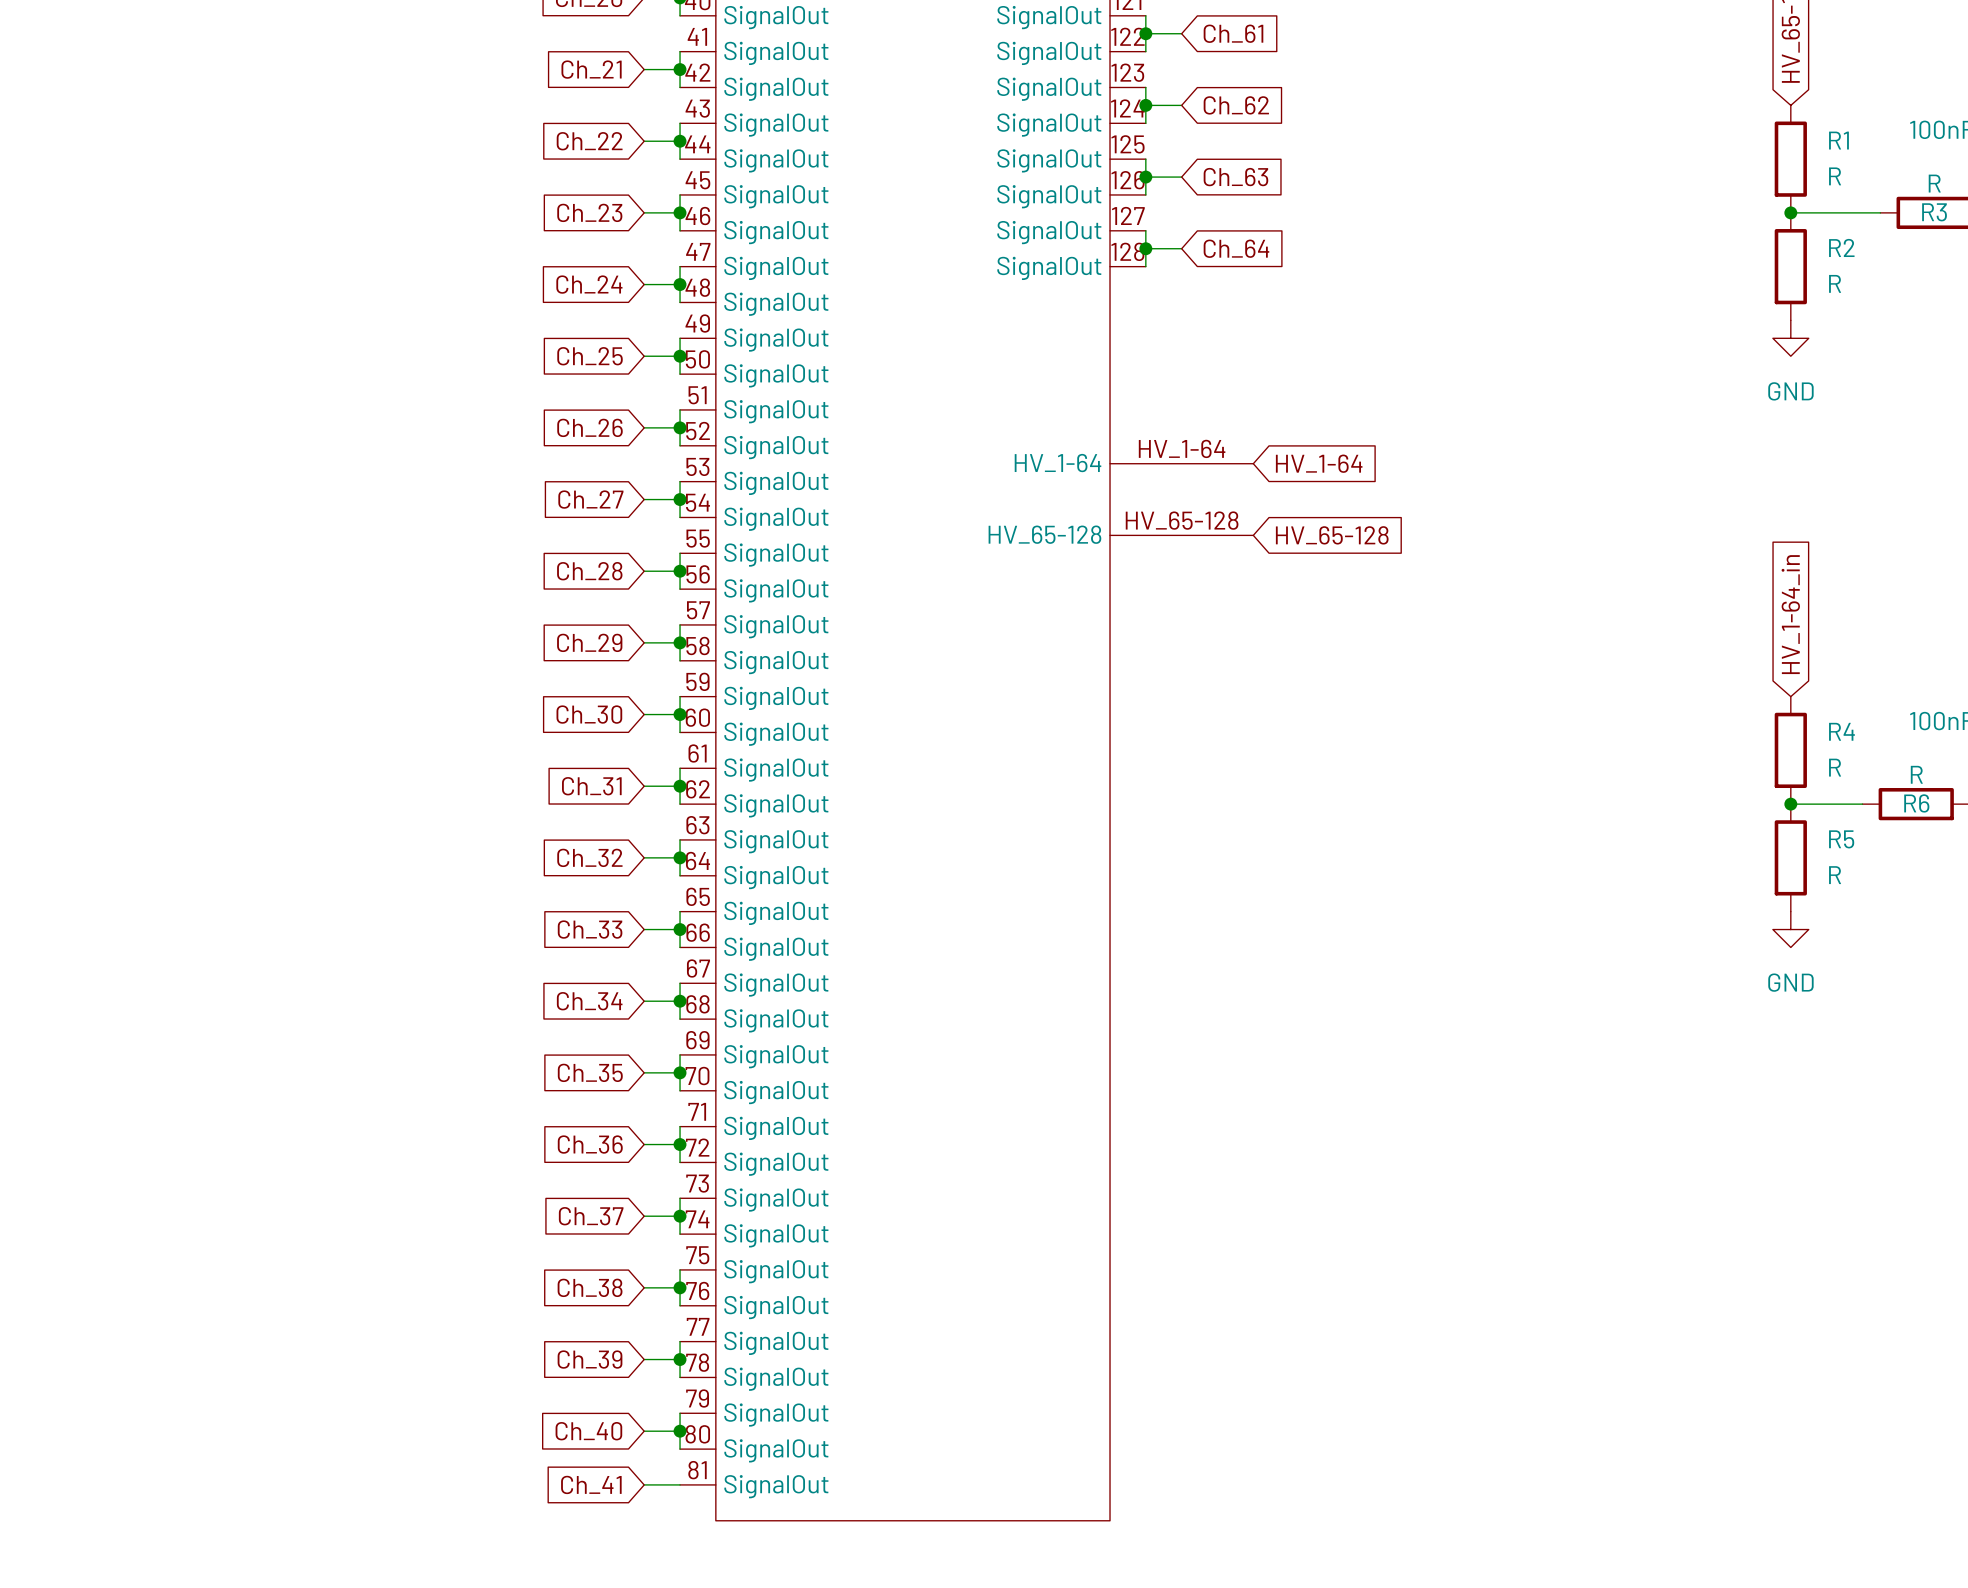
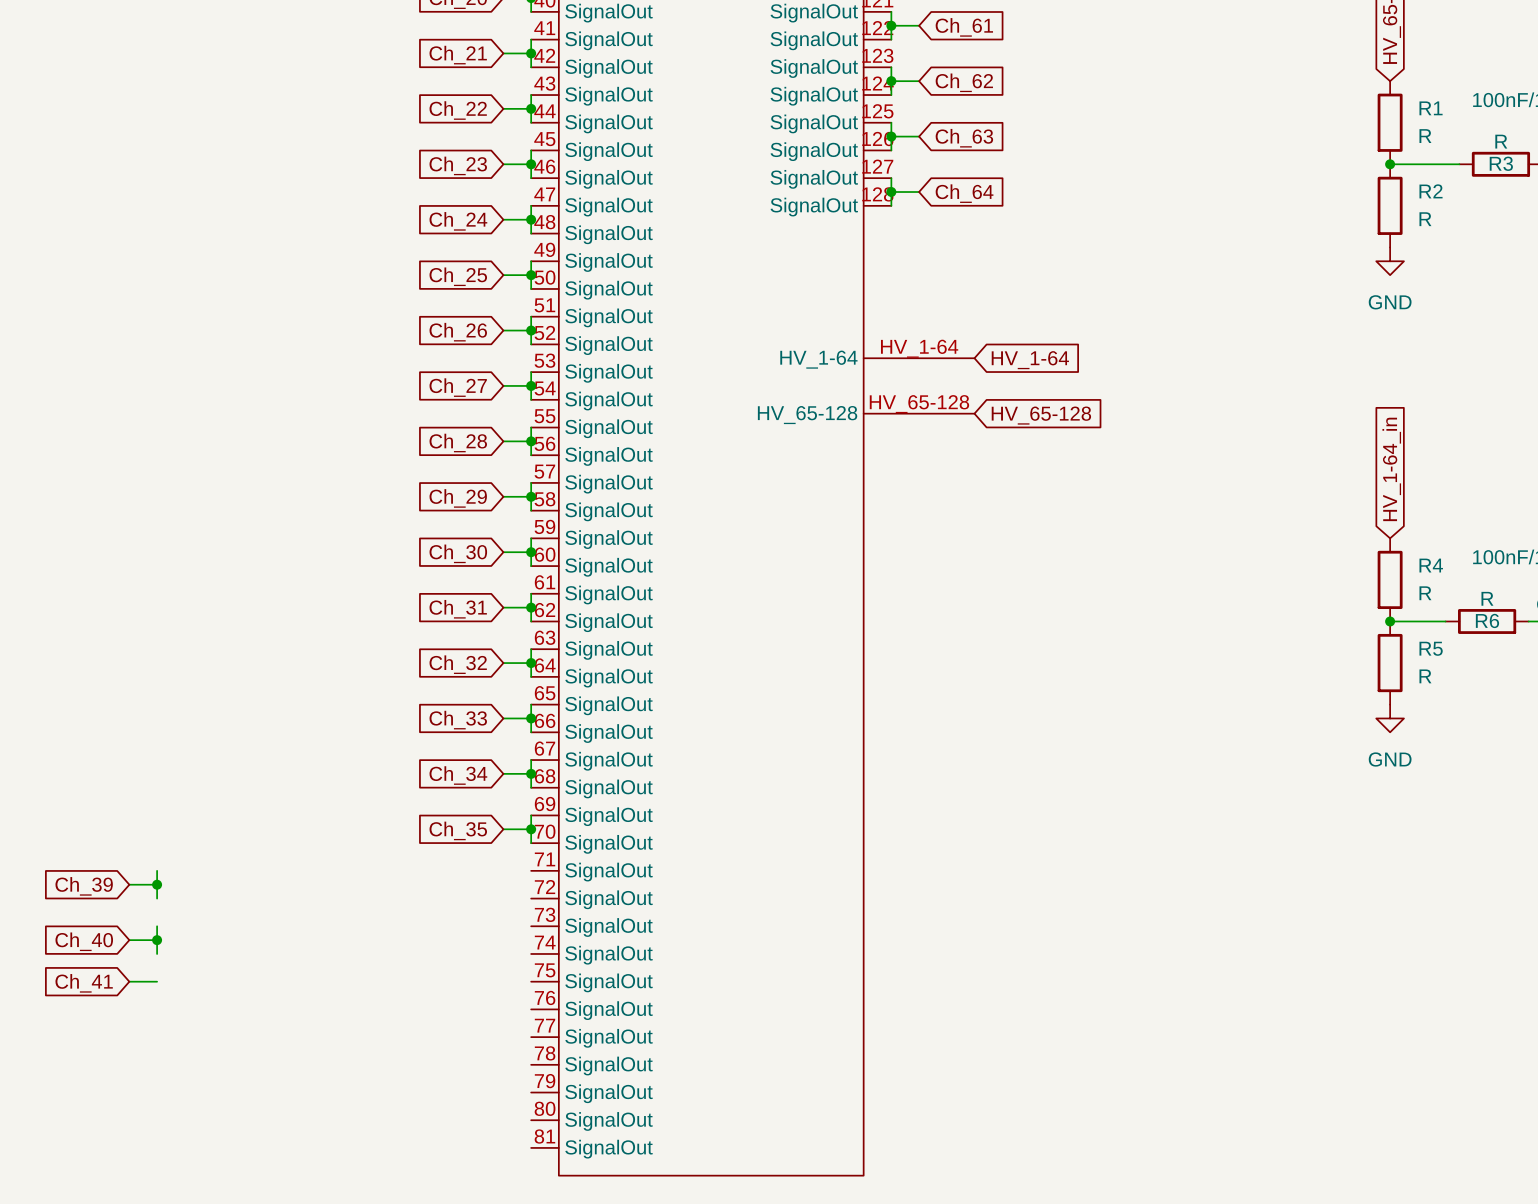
wire: none -> (157, 870) (157, 898)
wire: (680, 1126) (680, 1162) -> none
global label: none -> Ch_39 (84, 886)
wire: none -> (129, 884) (157, 884)
junction: none -> (157, 884)
global label: Ch_36 (590, 1144) -> none
wire: (644, 1144) (680, 1144) -> none
junction: (680, 1144) -> none
wire: none -> (157, 926) (157, 953)
wire: (680, 1198) (680, 1234) -> none
global label: none -> Ch_40 (84, 941)
wire: none -> (129, 940) (157, 940)
junction: none -> (157, 940)
global label: Ch_37 (591, 1216) -> none
wire: (644, 1216) (680, 1216) -> none
junction: (680, 1216) -> none
global label: none -> Ch_41 (84, 983)
wire: none -> (129, 981) (157, 981)
wire: (680, 1269) (680, 1305) -> none
global label: Ch_38 (590, 1287) -> none
wire: (644, 1287) (680, 1287) -> none
junction: (680, 1287) -> none
wire: (680, 1341) (680, 1377) -> none
global label: Ch_39 (590, 1359) -> none
wire: (644, 1359) (680, 1359) -> none
junction: (680, 1359) -> none
wire: (680, 1413) (680, 1449) -> none
global label: Ch_40 (588, 1431) -> none
wire: (644, 1431) (680, 1431) -> none
junction: (680, 1431) -> none
global label: Ch_41 (591, 1484) -> none
wire: (644, 1484) (680, 1484) -> none

